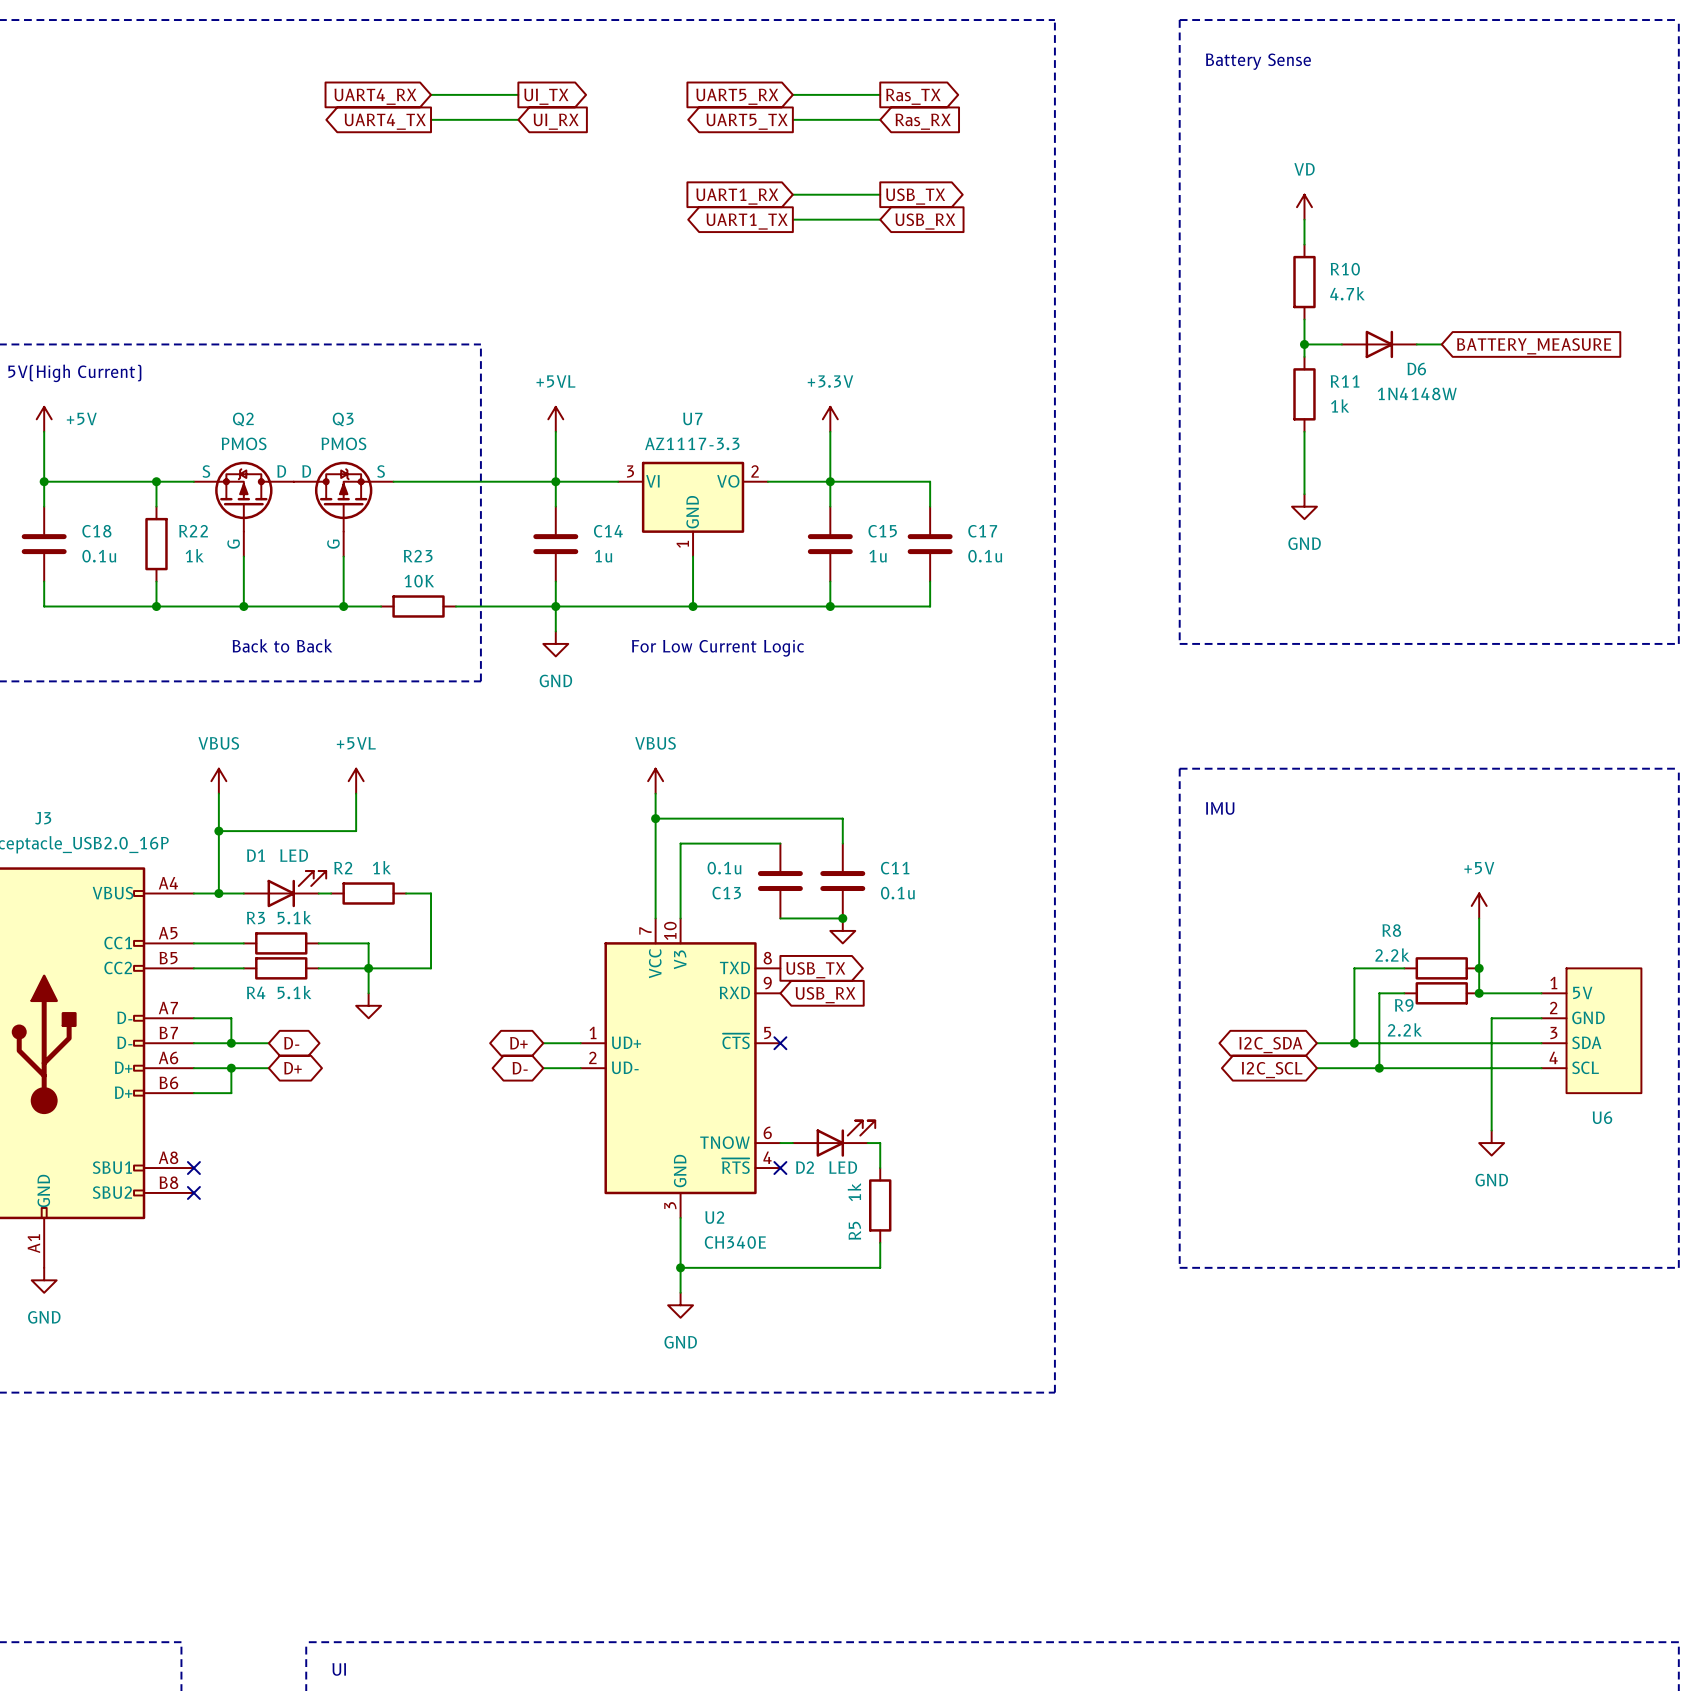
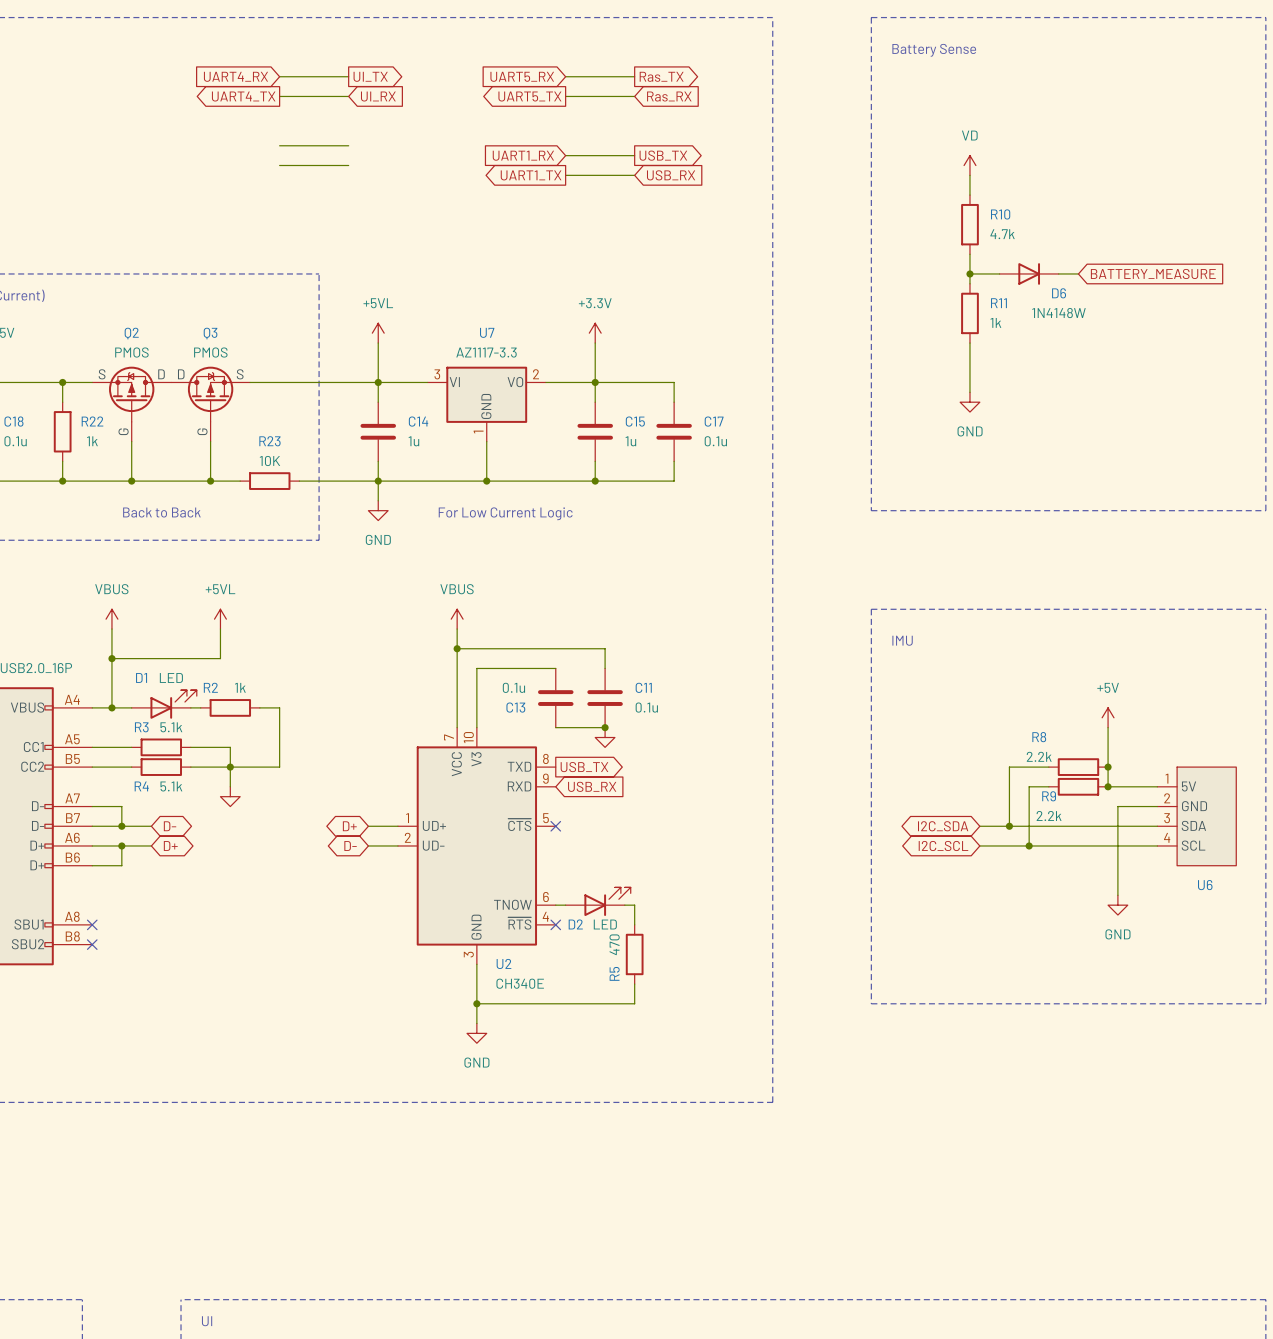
wire: none -> (279, 145) (348, 145)
wire: none -> (279, 165) (348, 165)
R5 value: 1k (854, 1192) -> 470 (614, 944)

